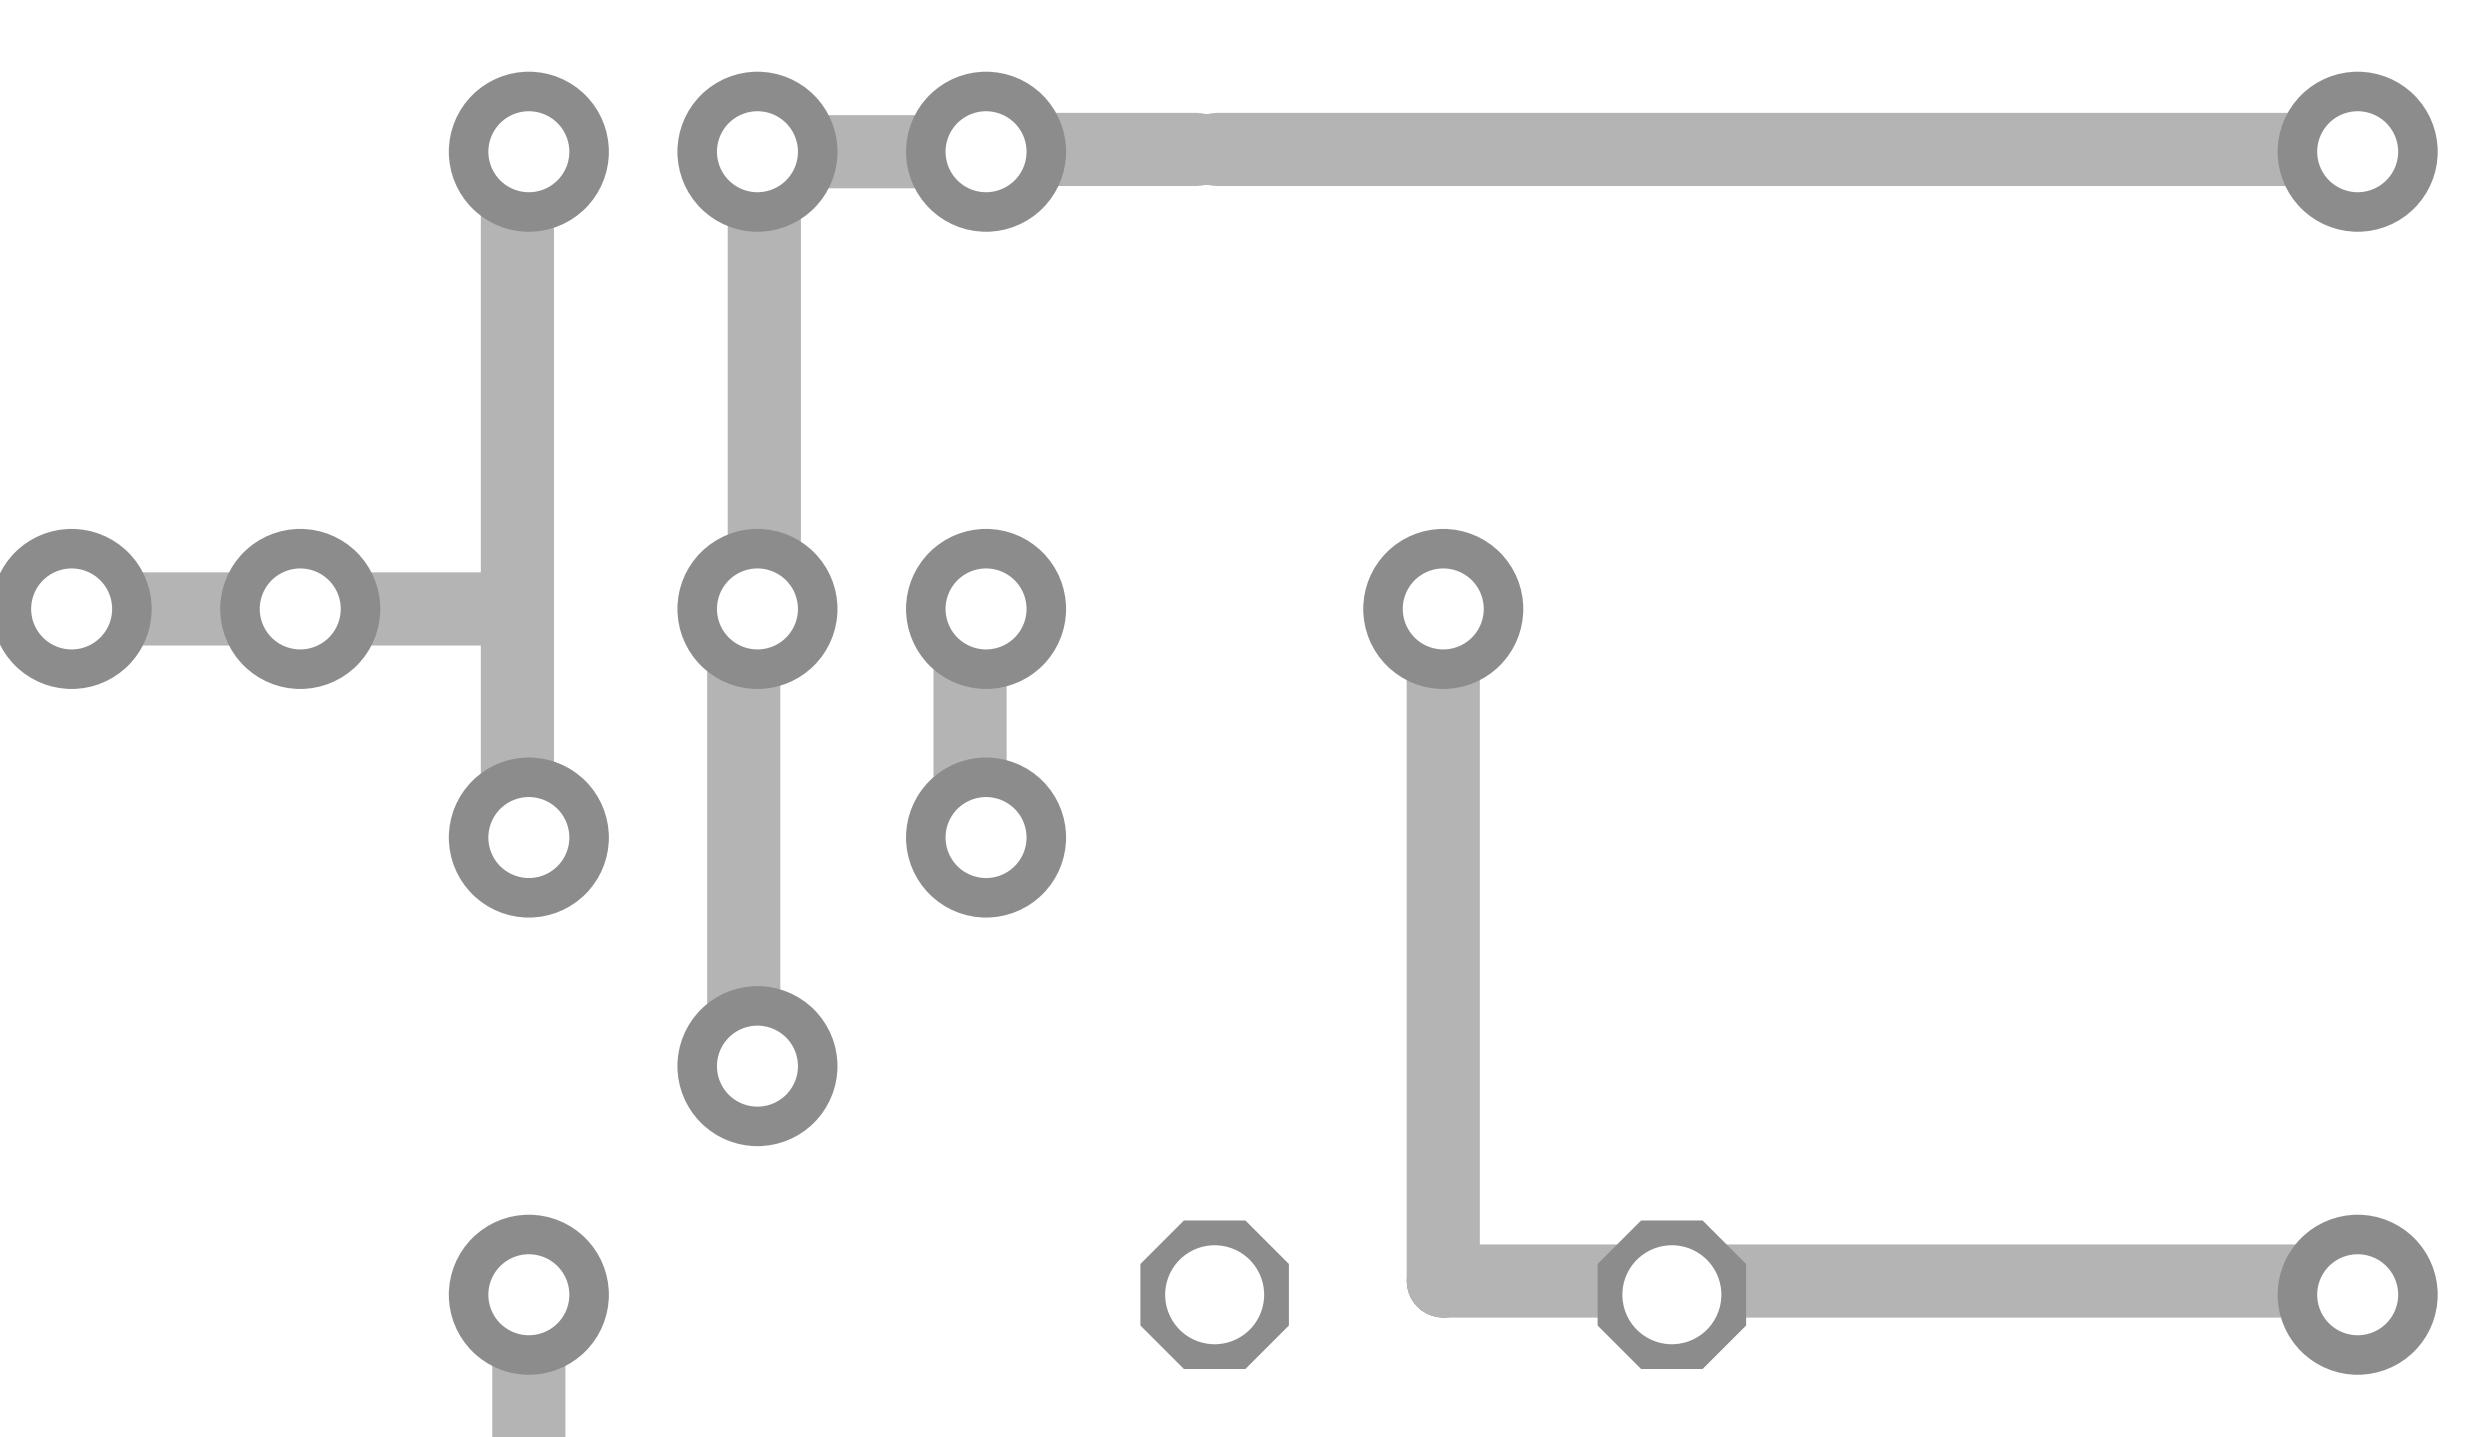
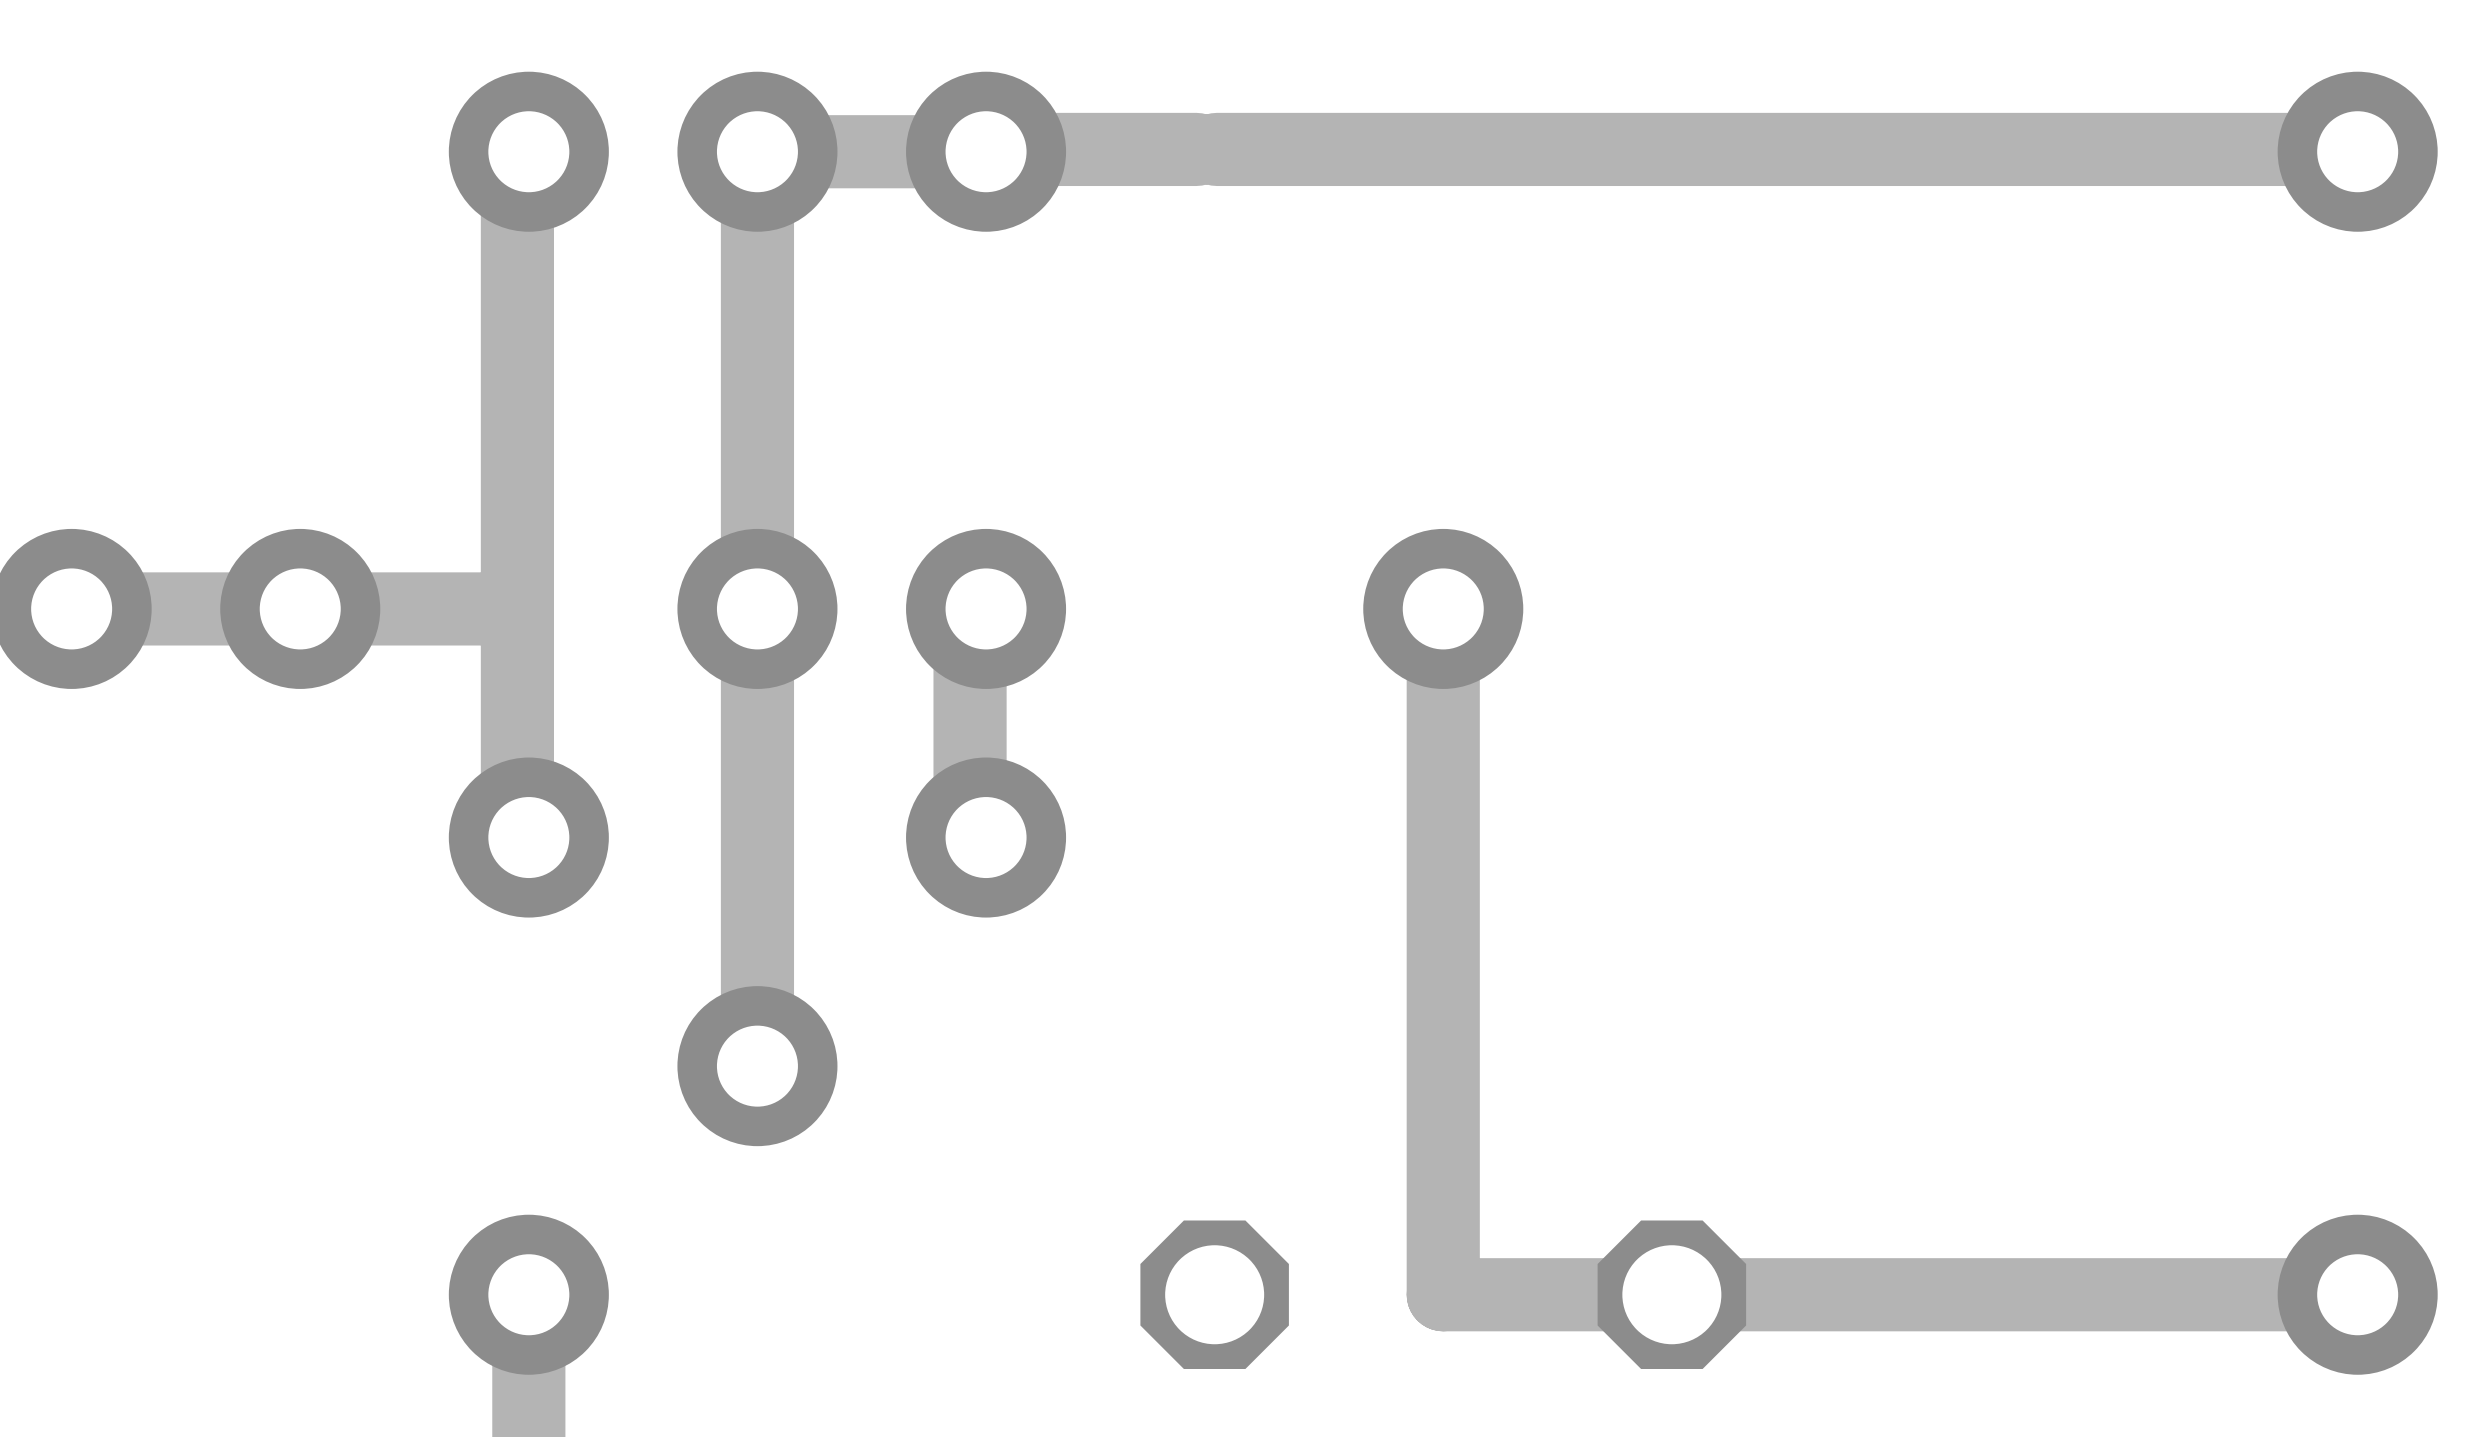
track: (757, 151) (764, 158) (764, 602) (743, 622) (743, 1050) (757, 1066) -> (757, 151) (757, 1066)
track: (1443, 1281) (1669, 1281) (1671, 1294) (1690, 1281) (2343, 1281) (2357, 1294) -> (1443, 1281) (1443, 1294) (2357, 1294)

